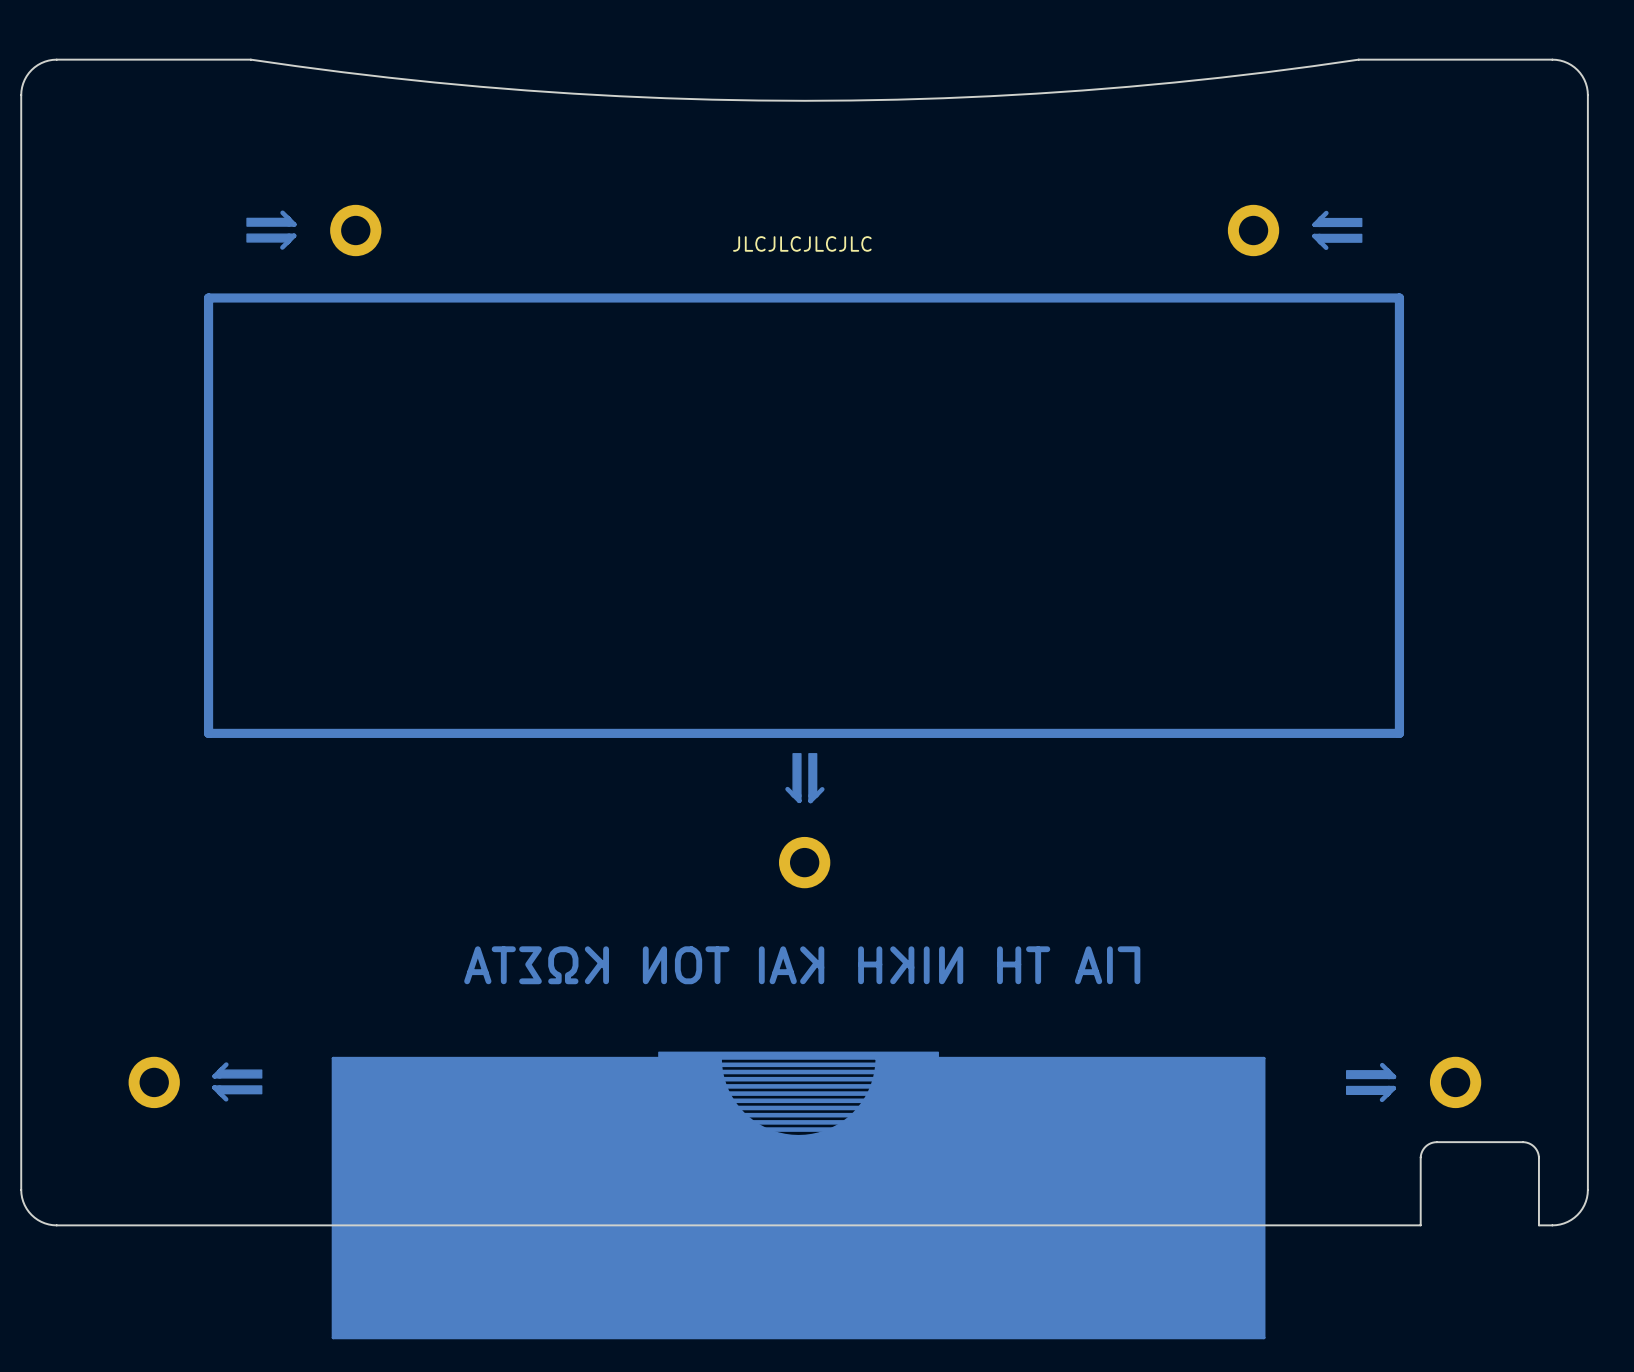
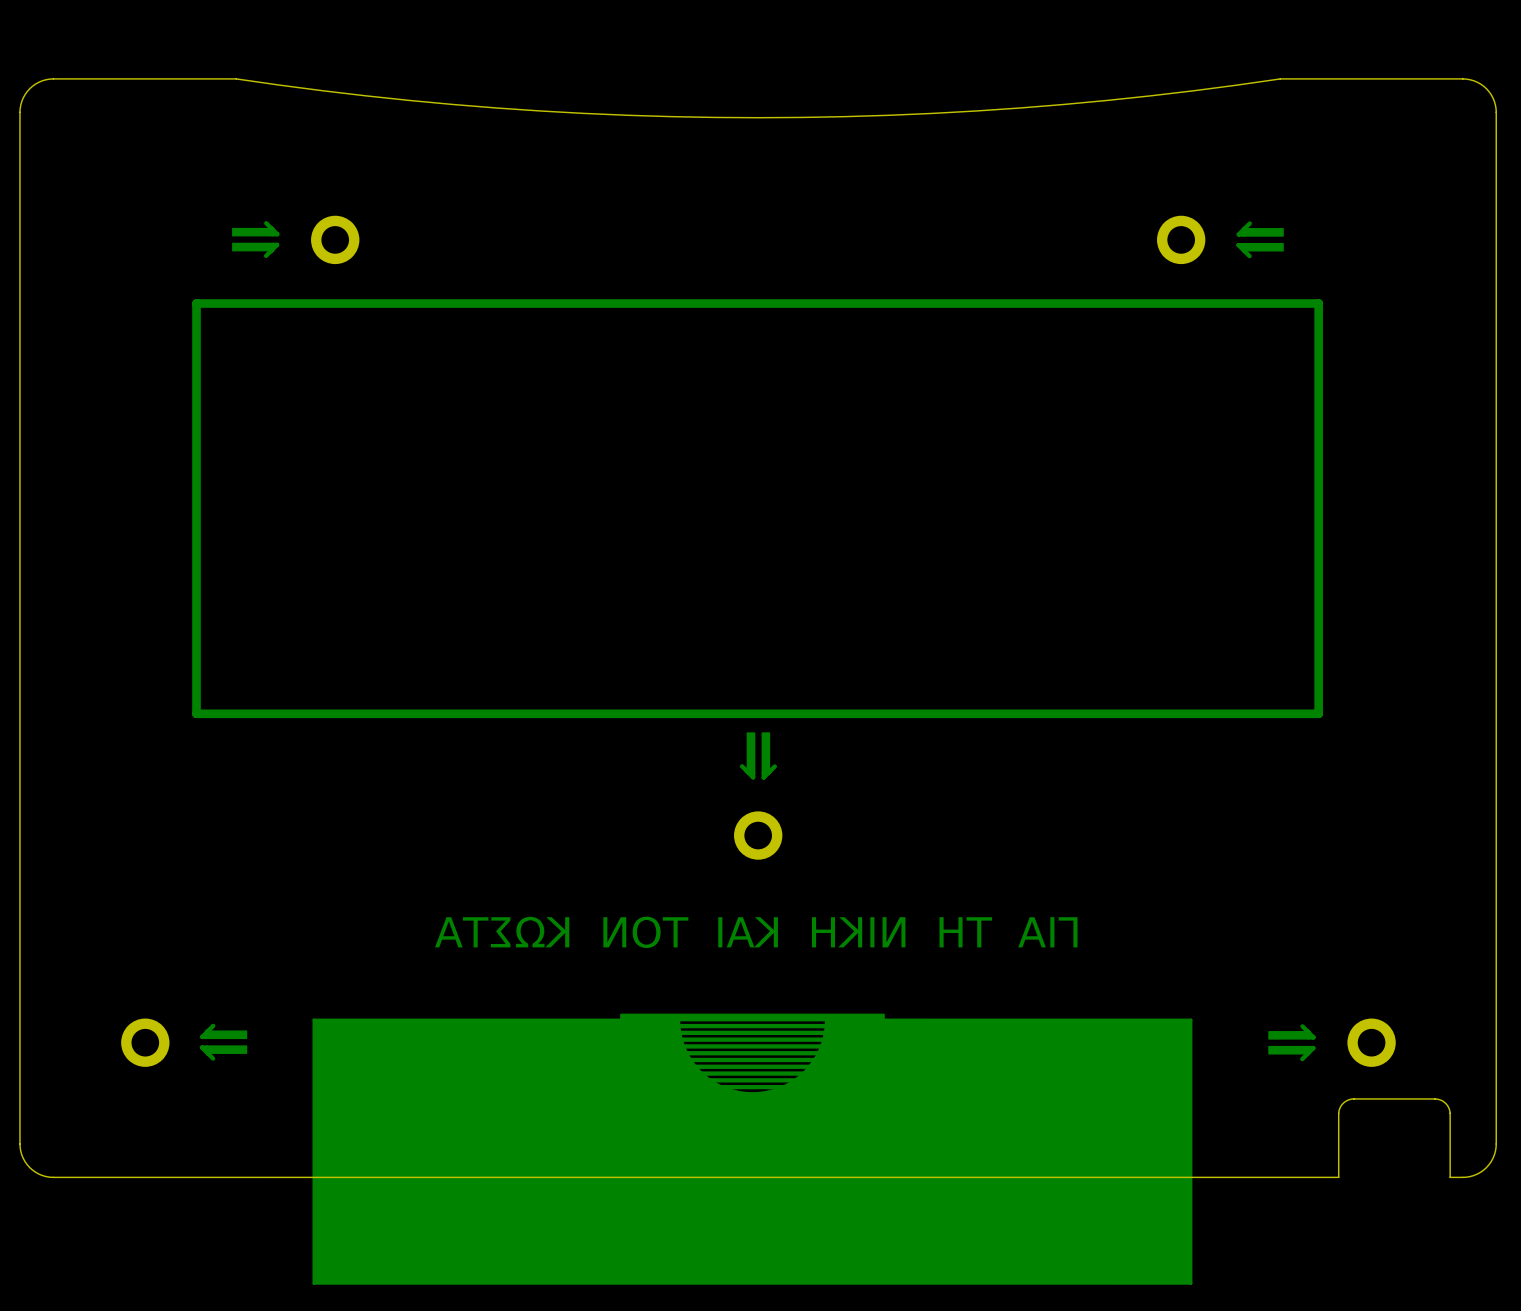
text: JLCJLCJLCJLC (802, 243) -> none

